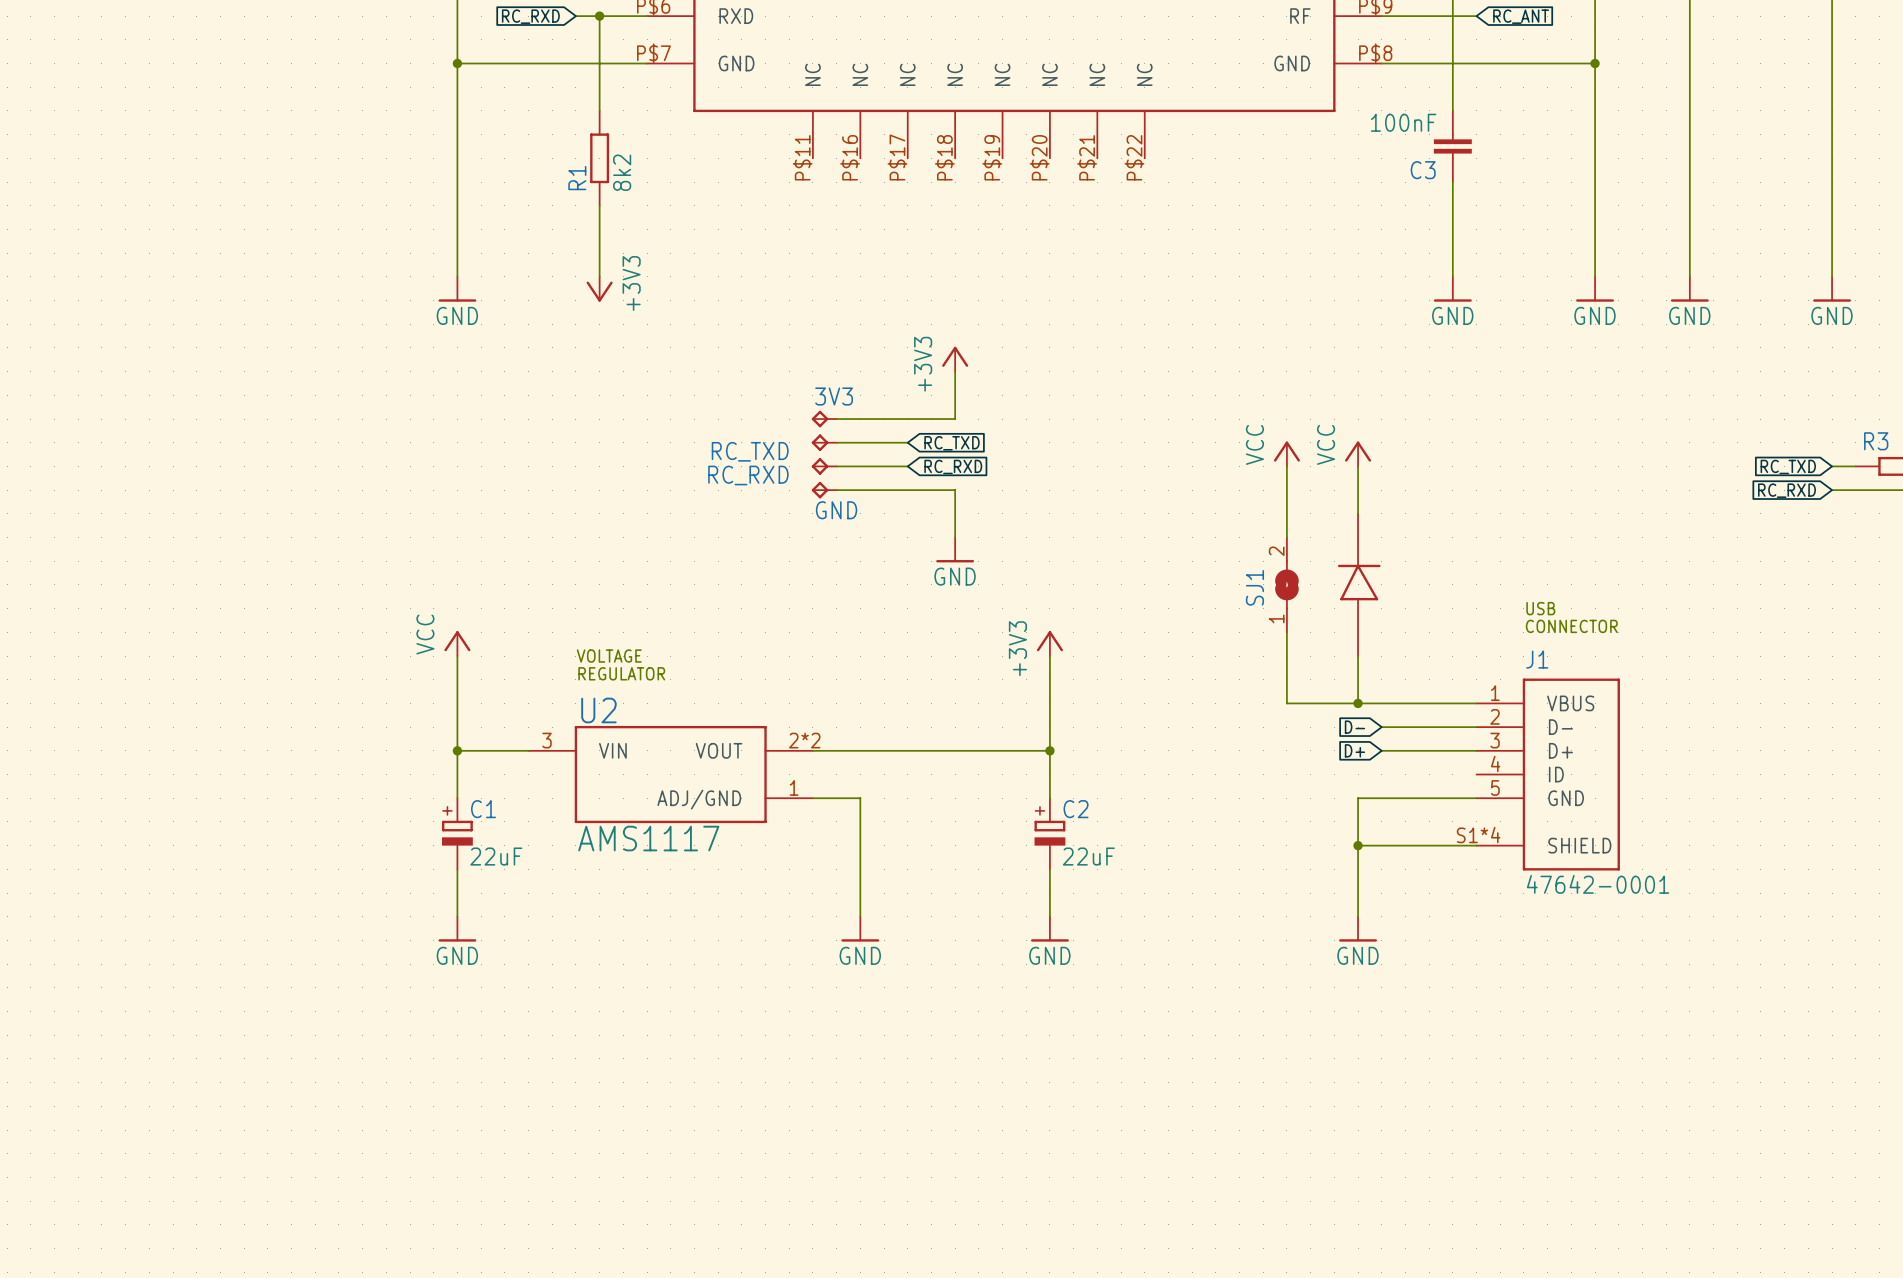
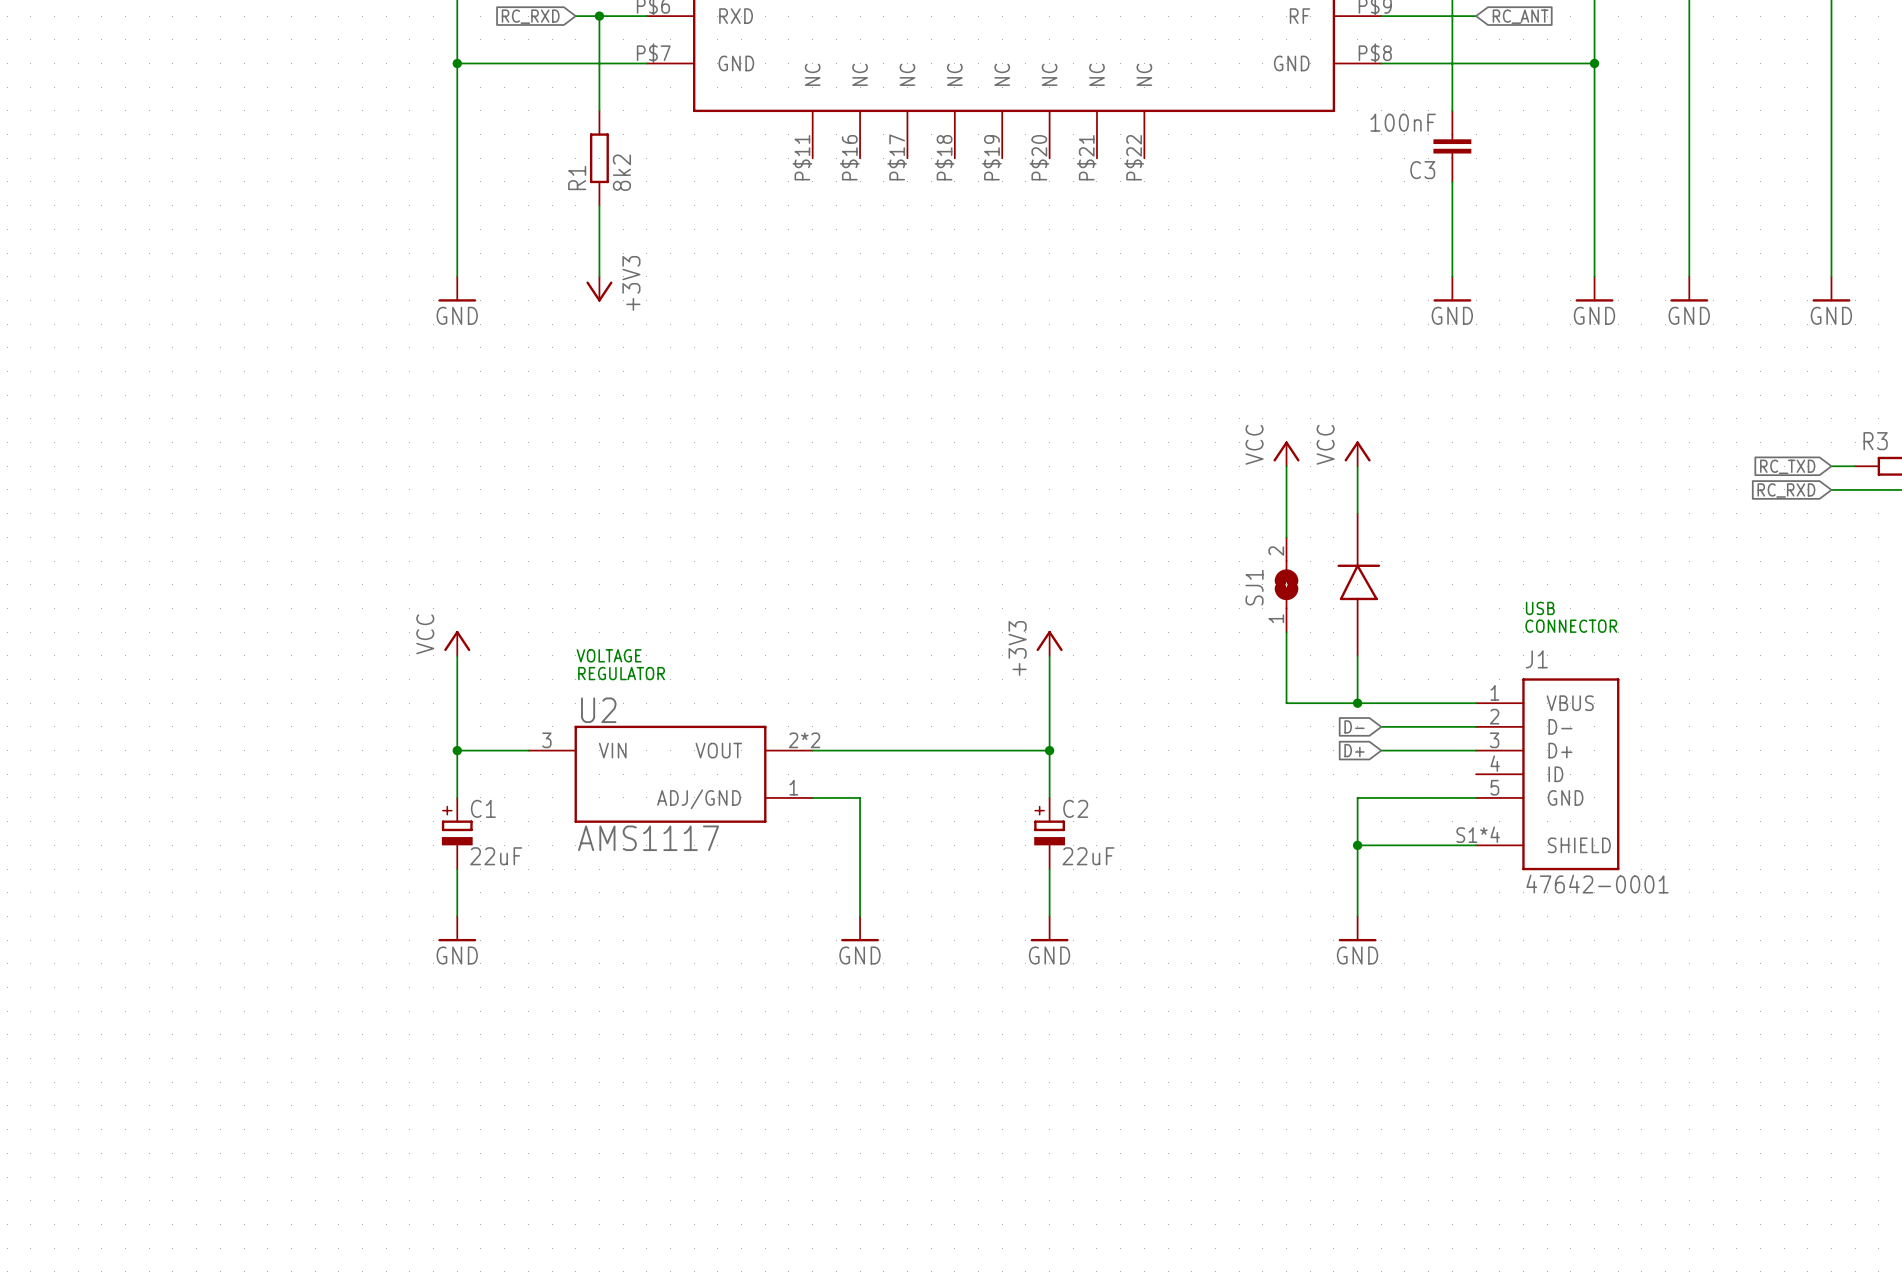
power symbol: +3V3 (955, 359) -> none
wire: (955, 371) (955, 419) (836, 419) -> none
3V3: (824, 419) -> none
RC_TXD: (824, 442) -> none
wire: (836, 442) (907, 442) -> none
global label: RC_TXD (952, 443) -> none
RC_RXD: (824, 466) -> none
wire: (836, 466) (907, 466) -> none
global label: RC_RXD (953, 466) -> none
GND: (824, 490) -> none
wire: (836, 490) (955, 490) (955, 537) -> none
power symbol: GND (955, 549) -> none

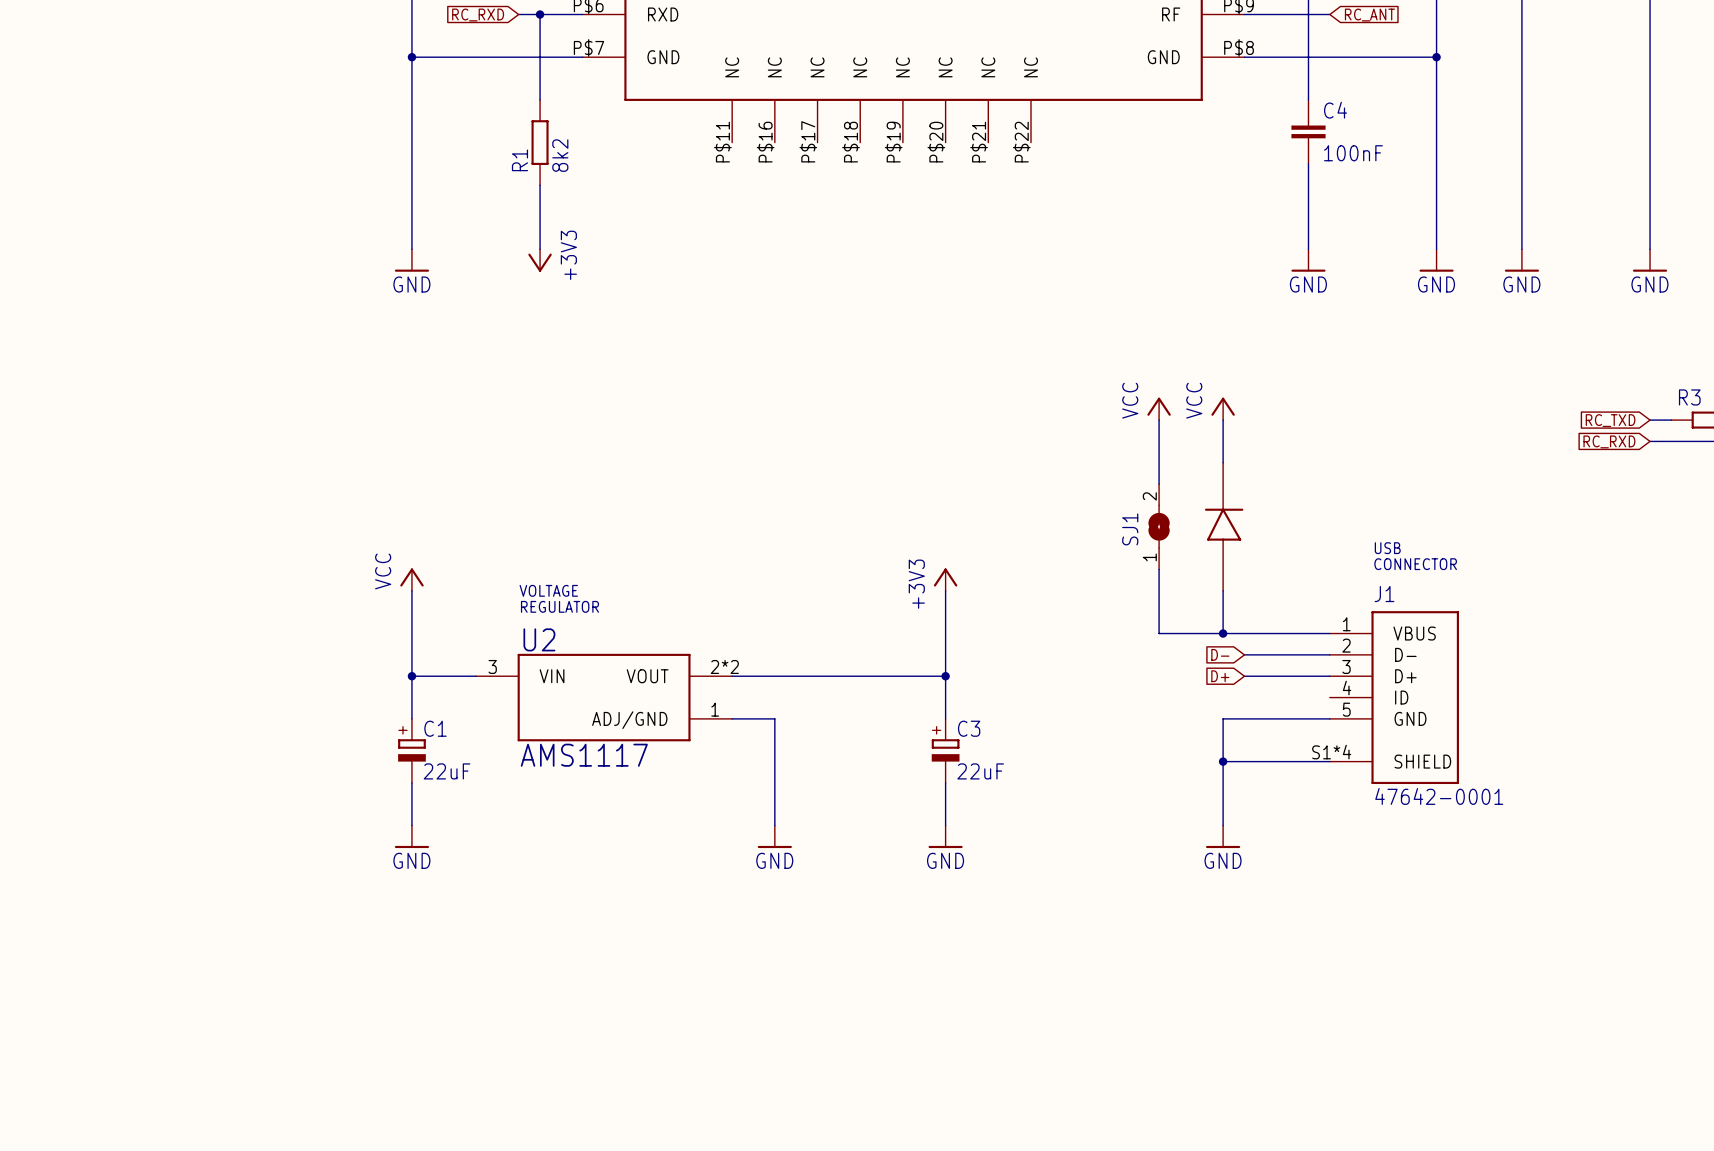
C3 value position: 100nF (1403, 122) -> 100nF (1353, 153)
C3 name: C3 (1422, 170) -> C4 (1335, 110)
C2 name: C2 (1075, 808) -> C3 (969, 728)

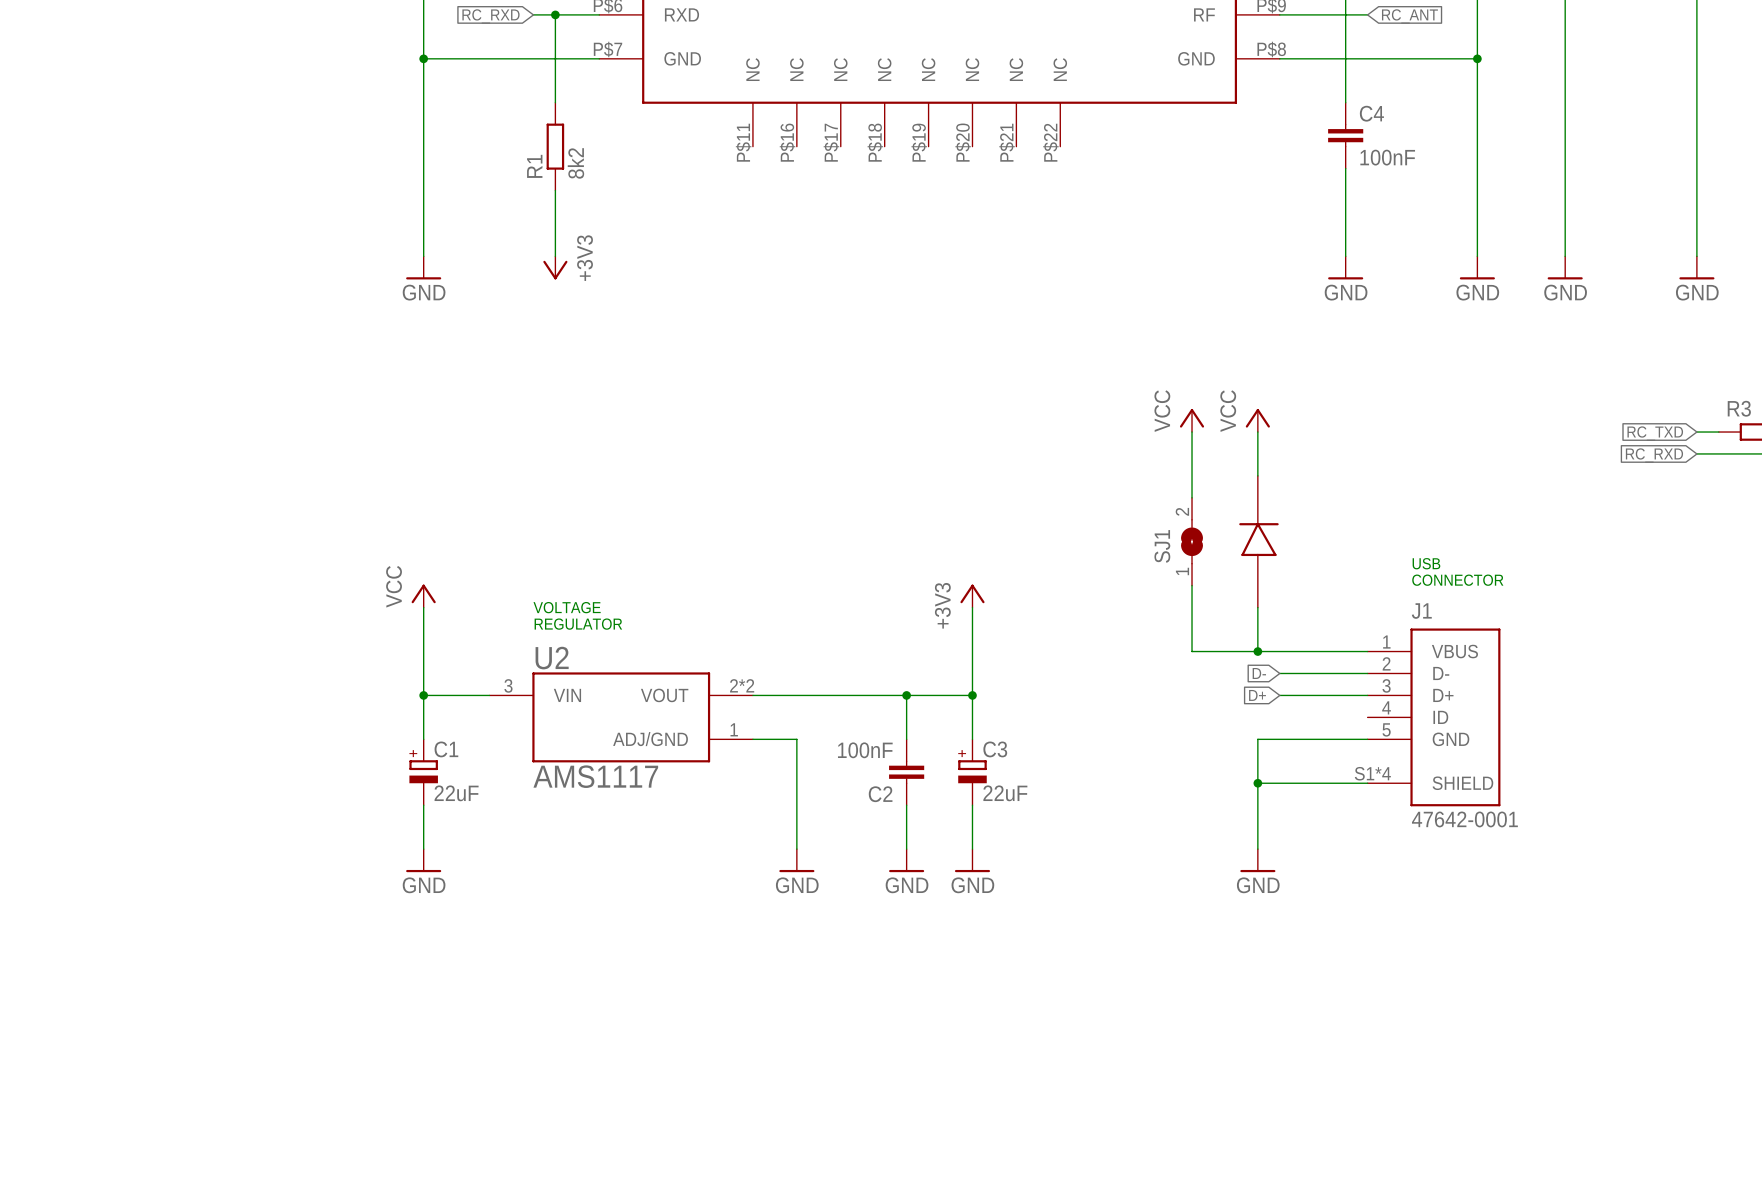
wire: none -> (906, 695) (906, 739)
junction: none -> (906, 695)
C2: none -> 100nF (906, 772)
wire: none -> (906, 805) (906, 849)
power symbol: none -> GND (906, 860)

